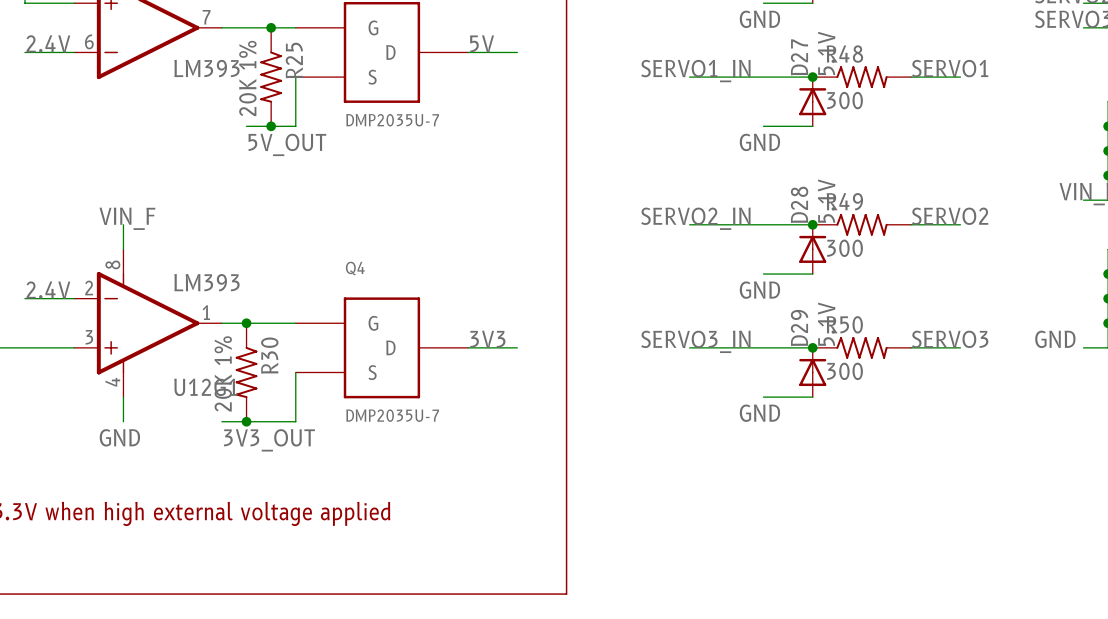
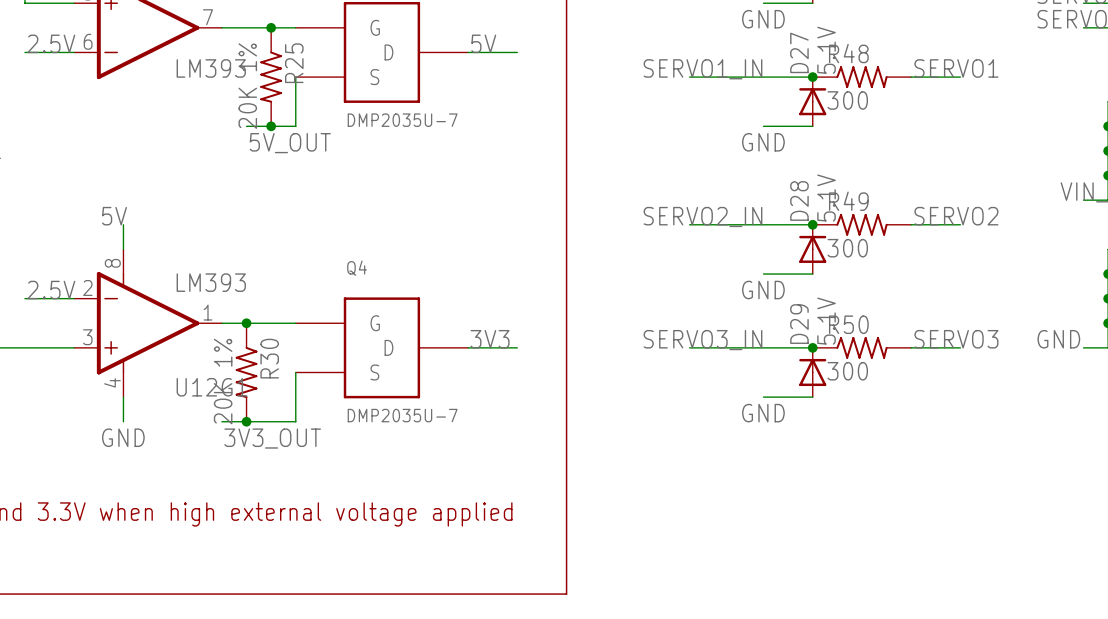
label: 2.4V (48, 43) -> 2.5V (51, 43)
label: VIN_F (127, 218) -> 5V (114, 216)
label: 2.4V (48, 290) -> 2.5V (51, 290)

